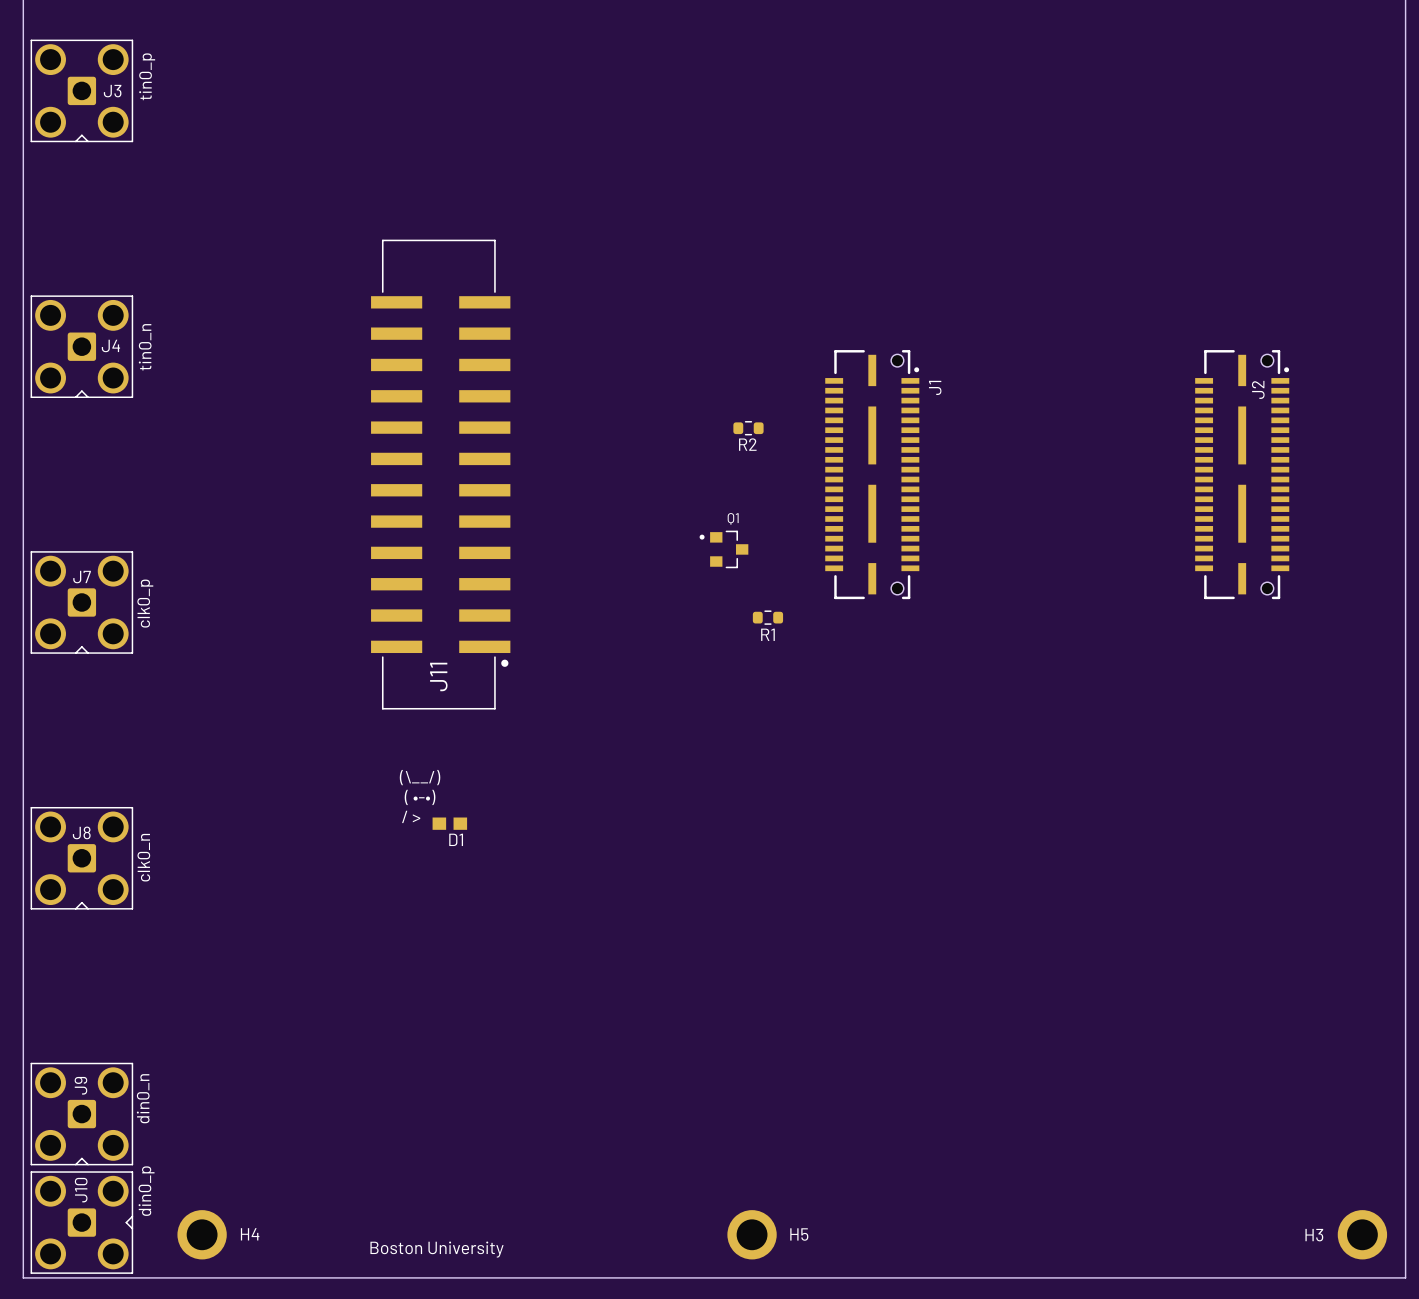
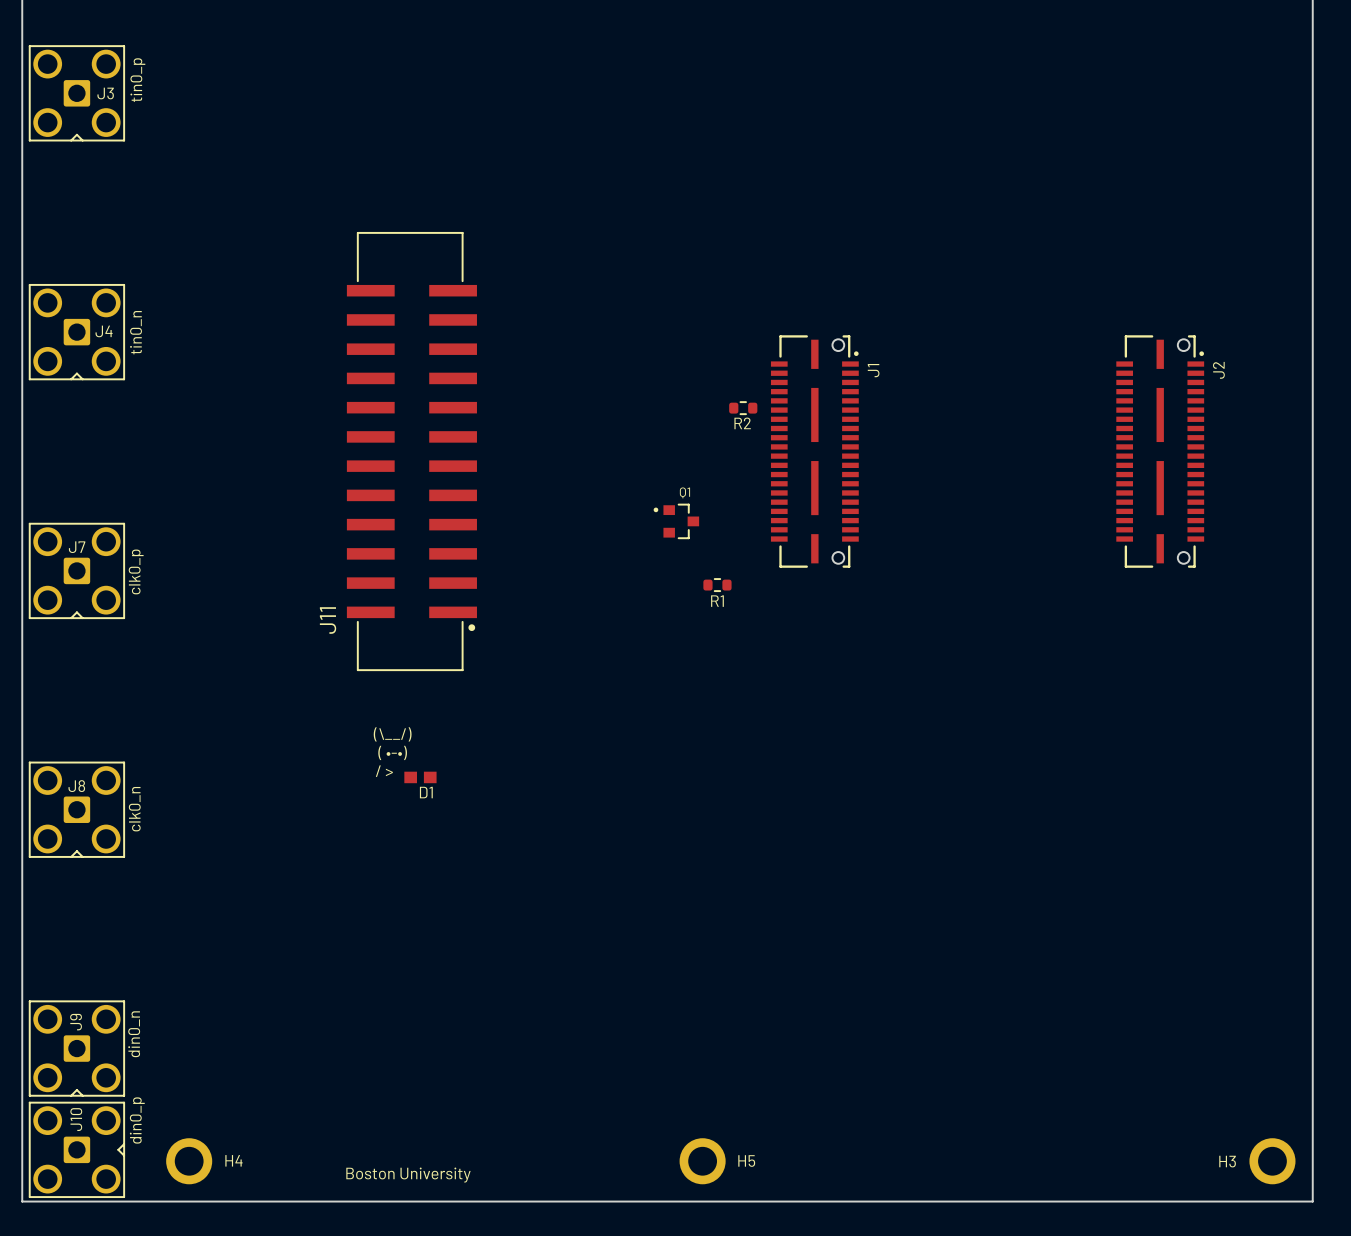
J2 name position: J2 (1258, 389) -> J2 (1218, 370)
R2 position: (748, 428) -> (743, 408)
J11 name position: J11 (438, 676) -> J11 (328, 620)

